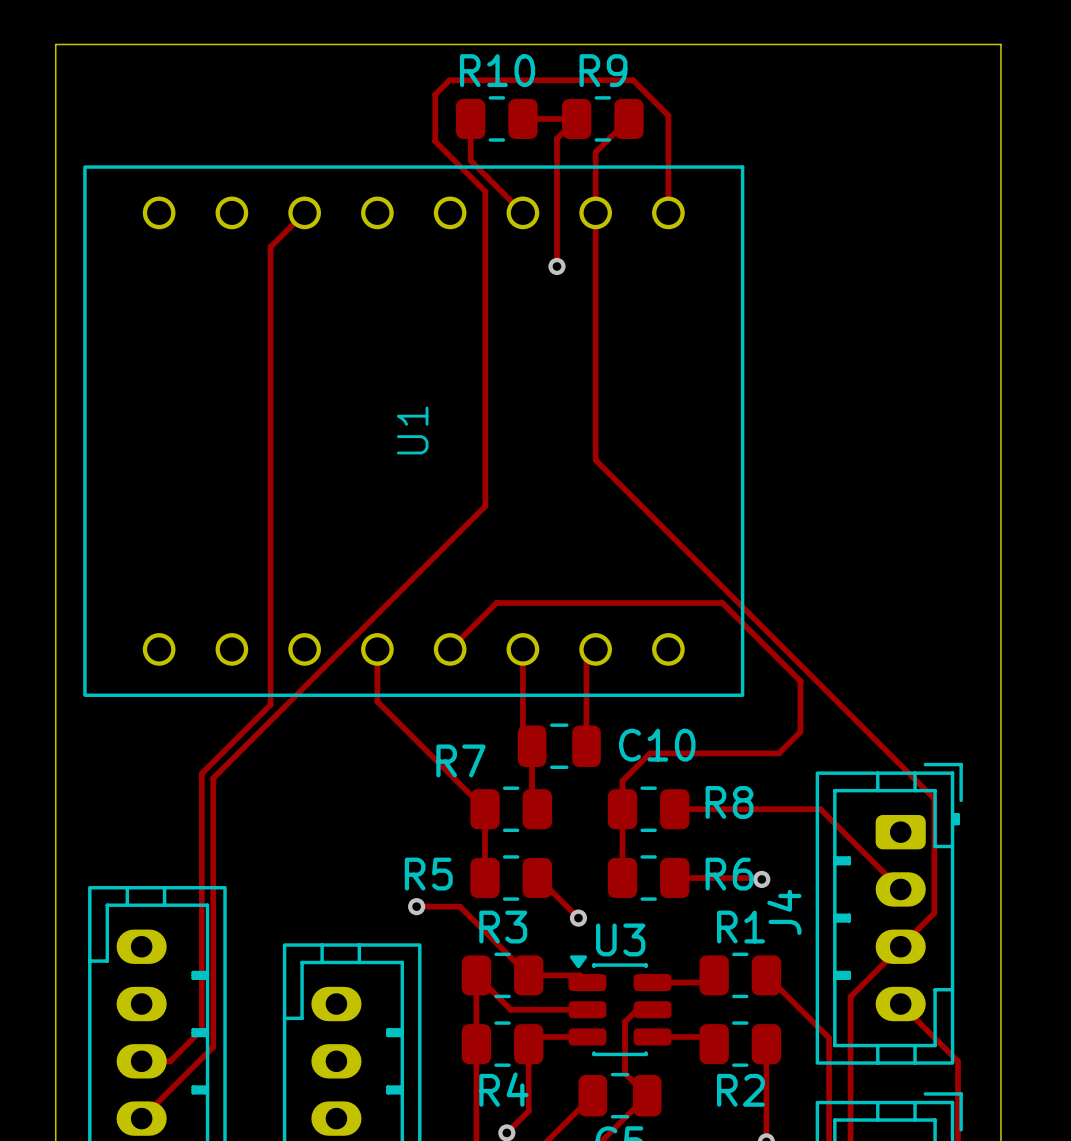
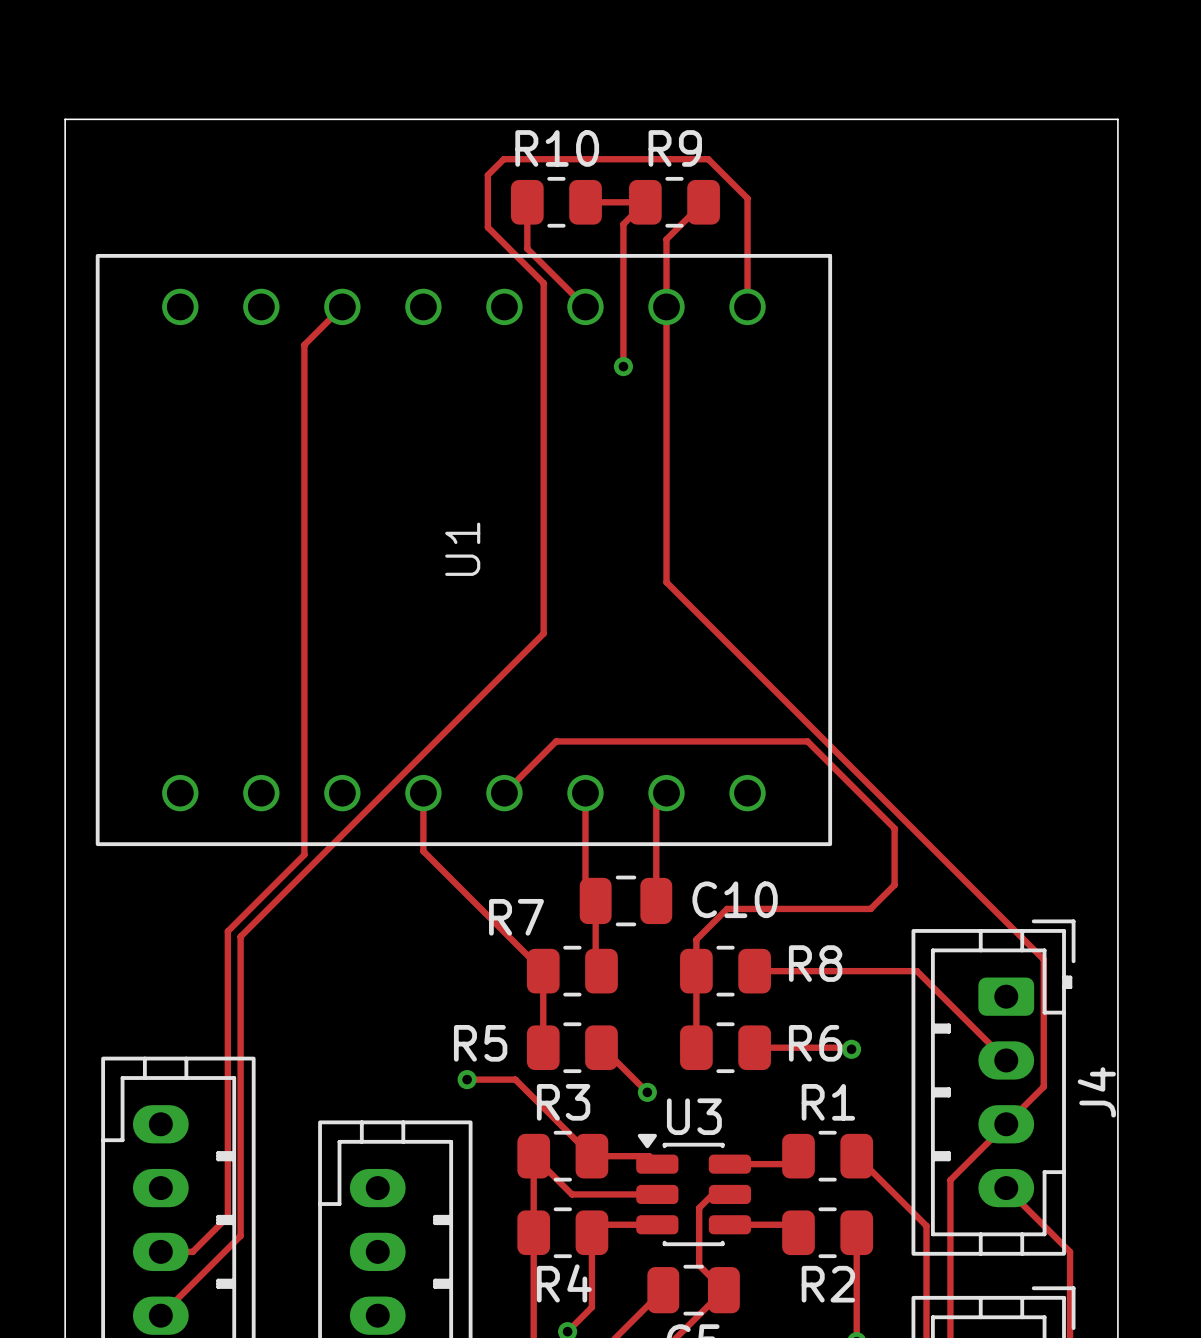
J4 name position: J4 (784, 912) -> J4 (1096, 1092)

